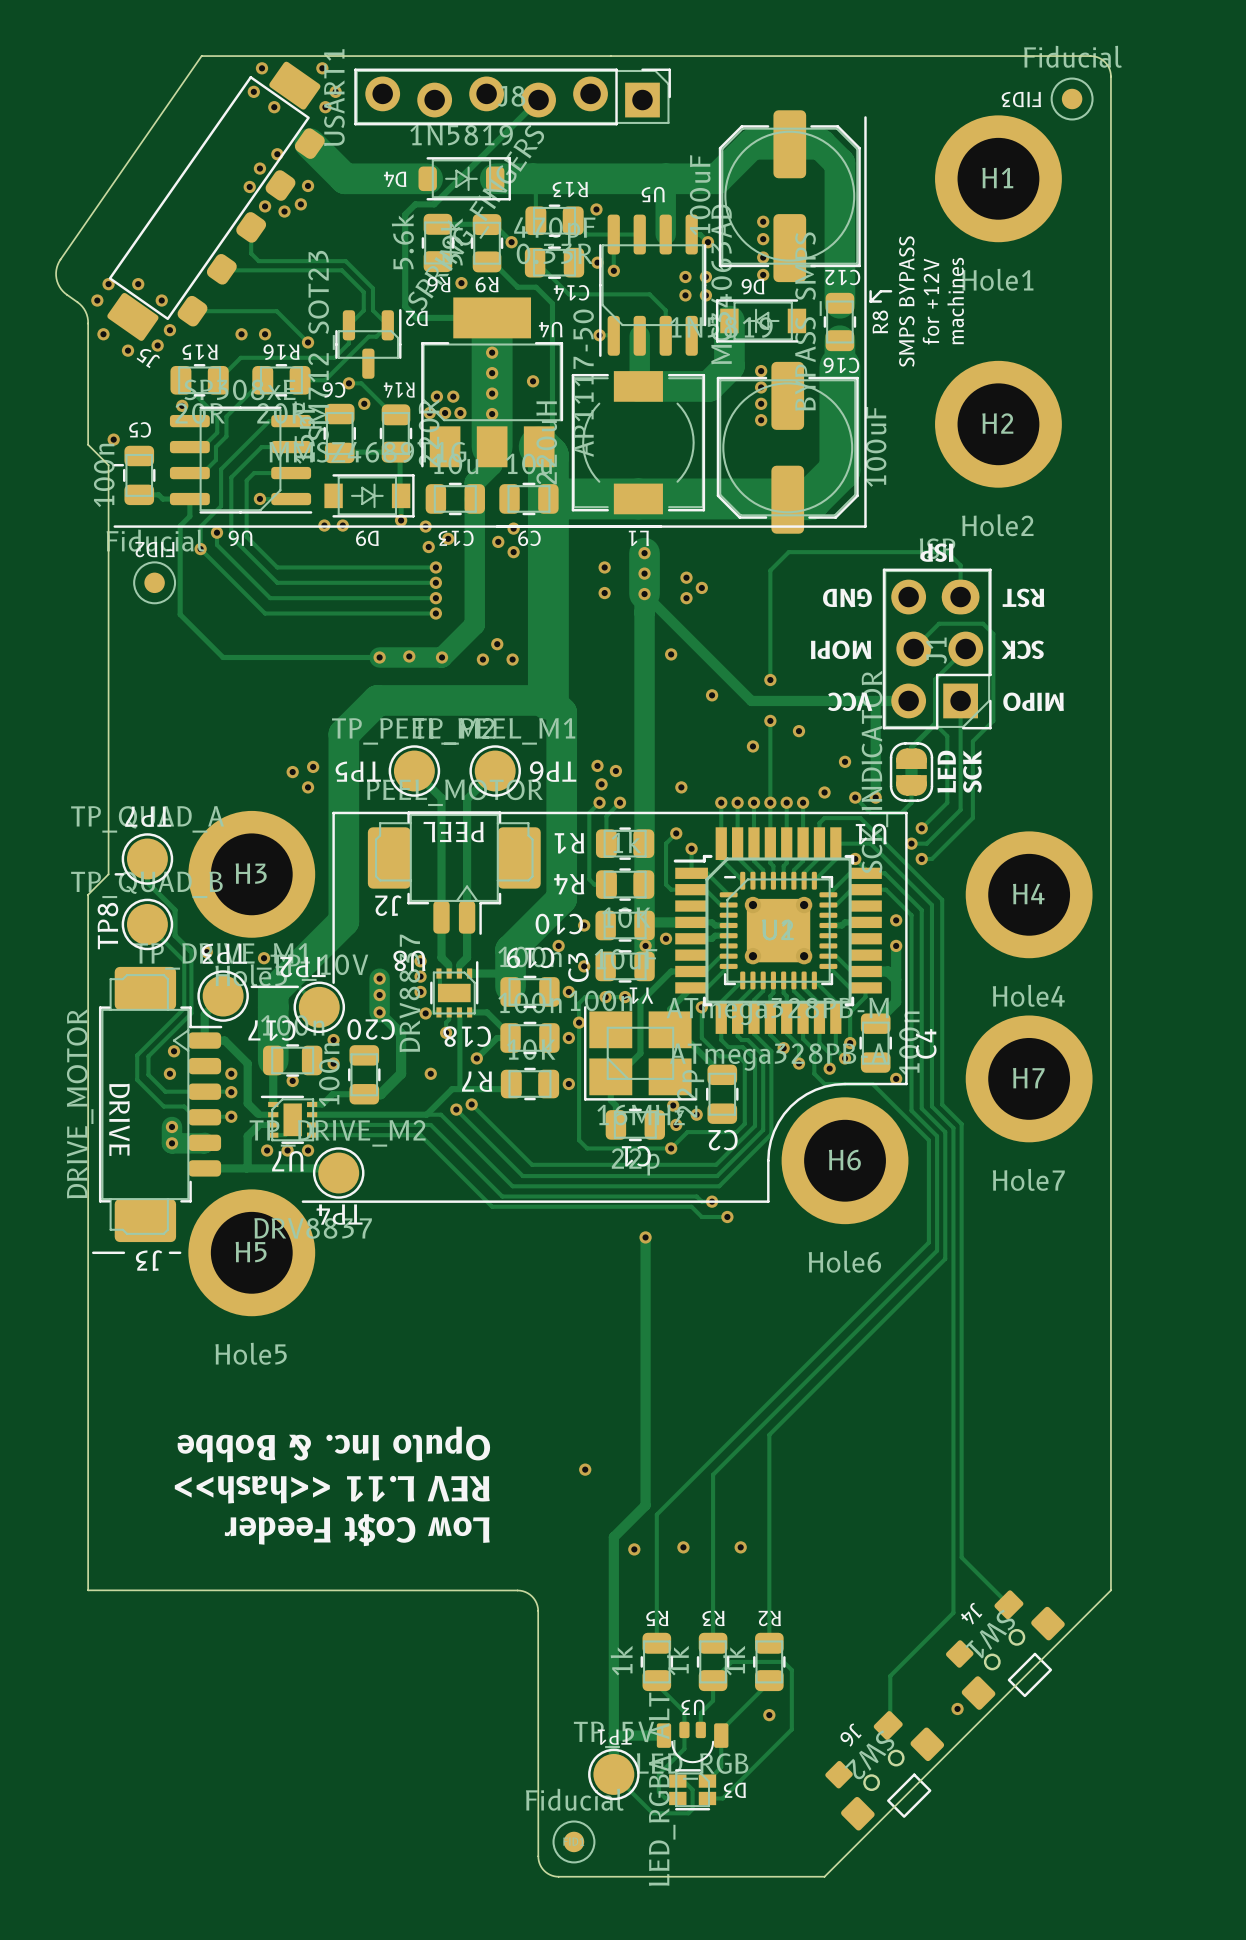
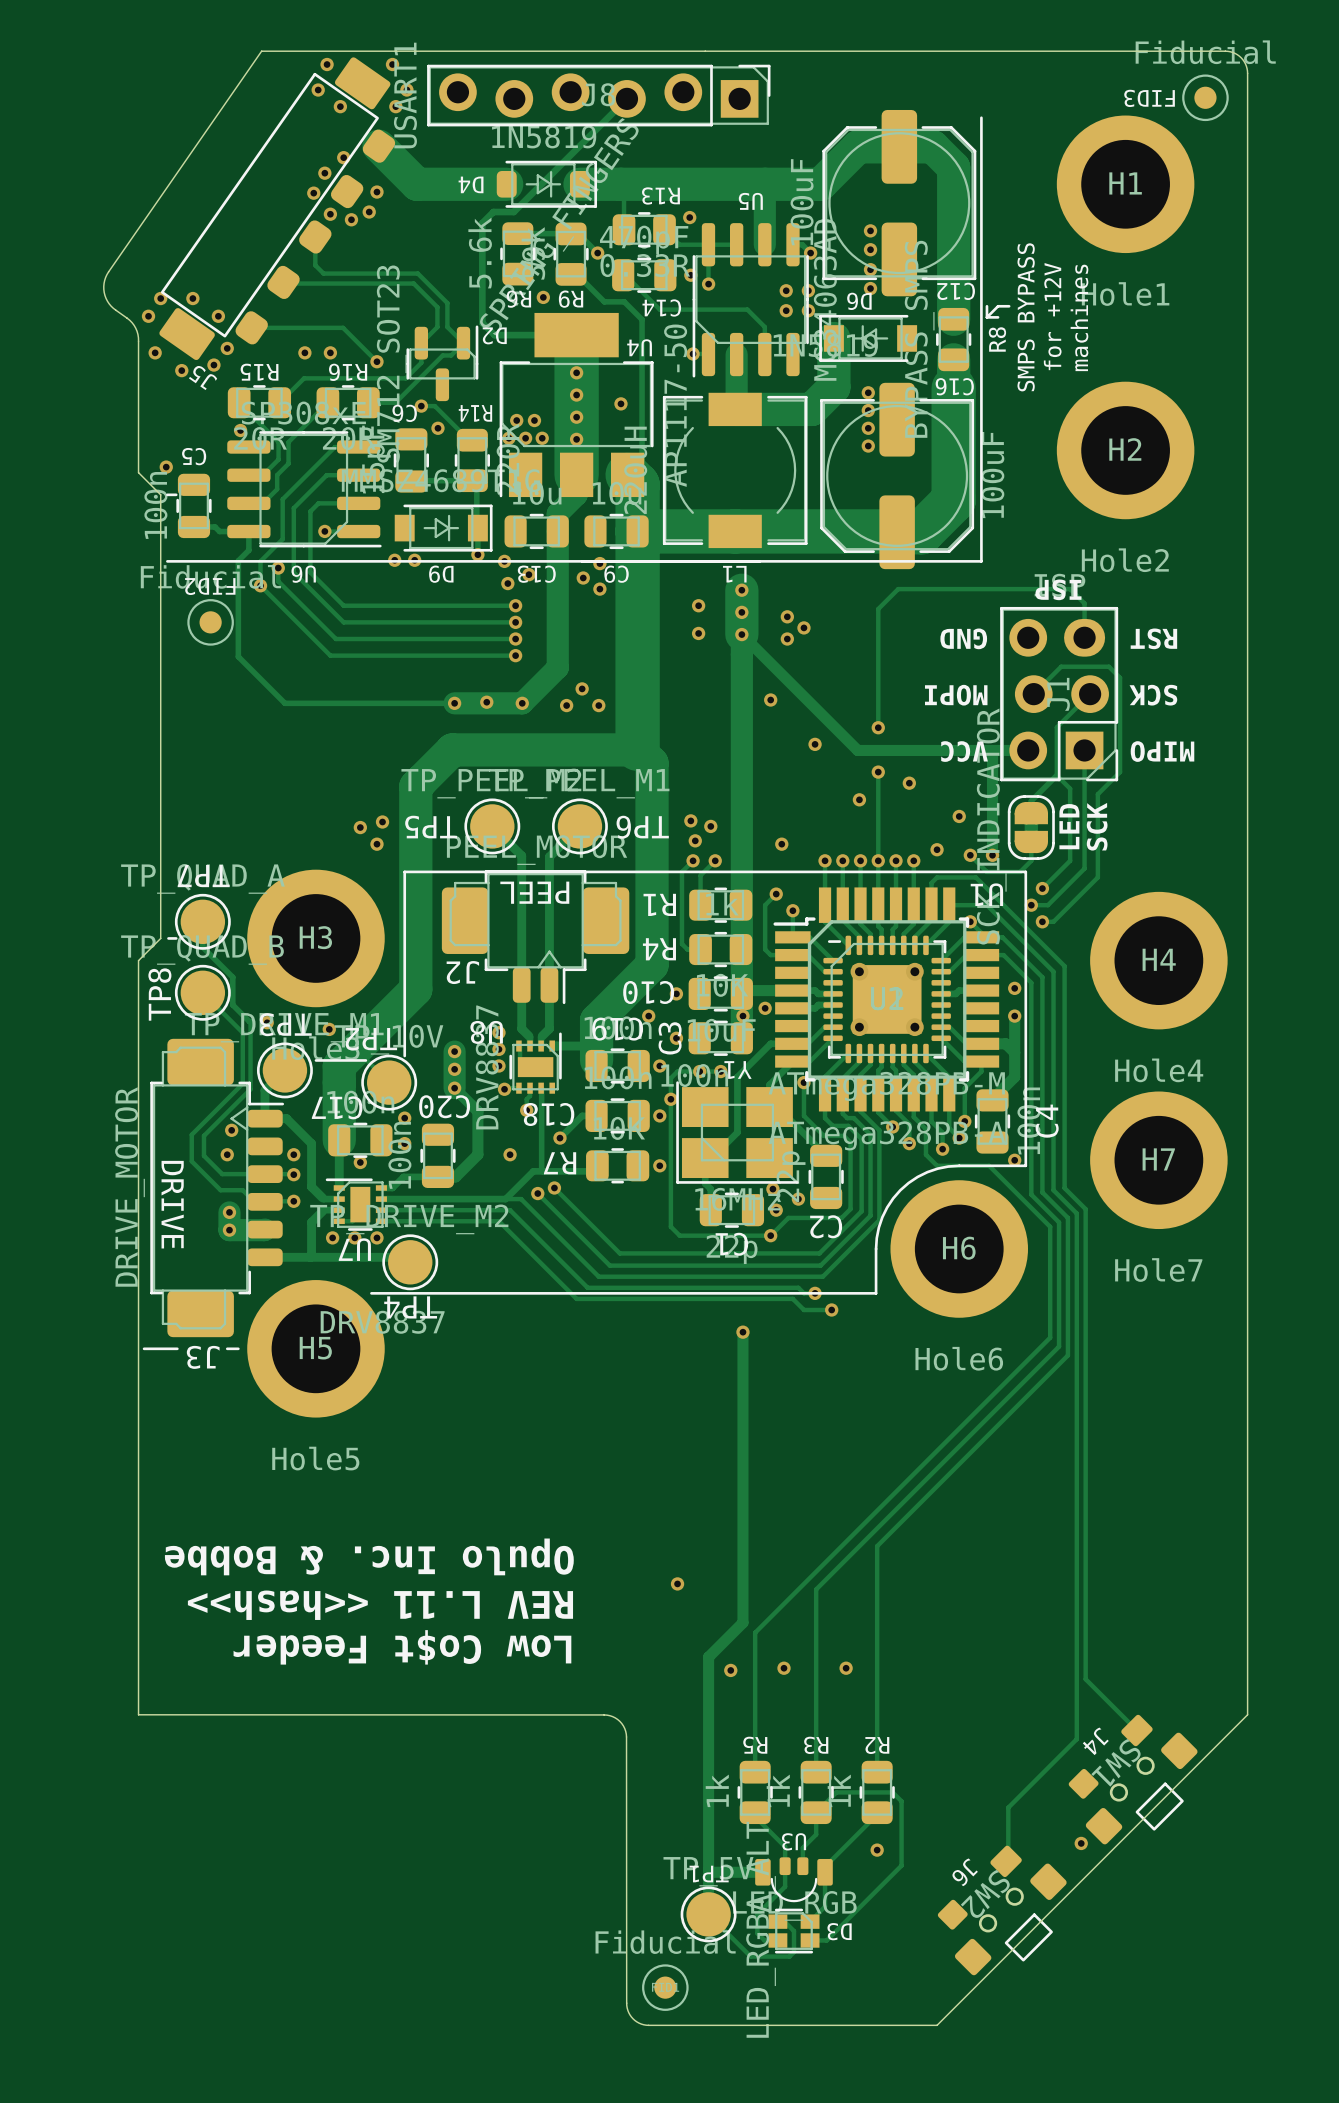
track: (469, 1012) (487, 1012) (510, 1035) -> none

